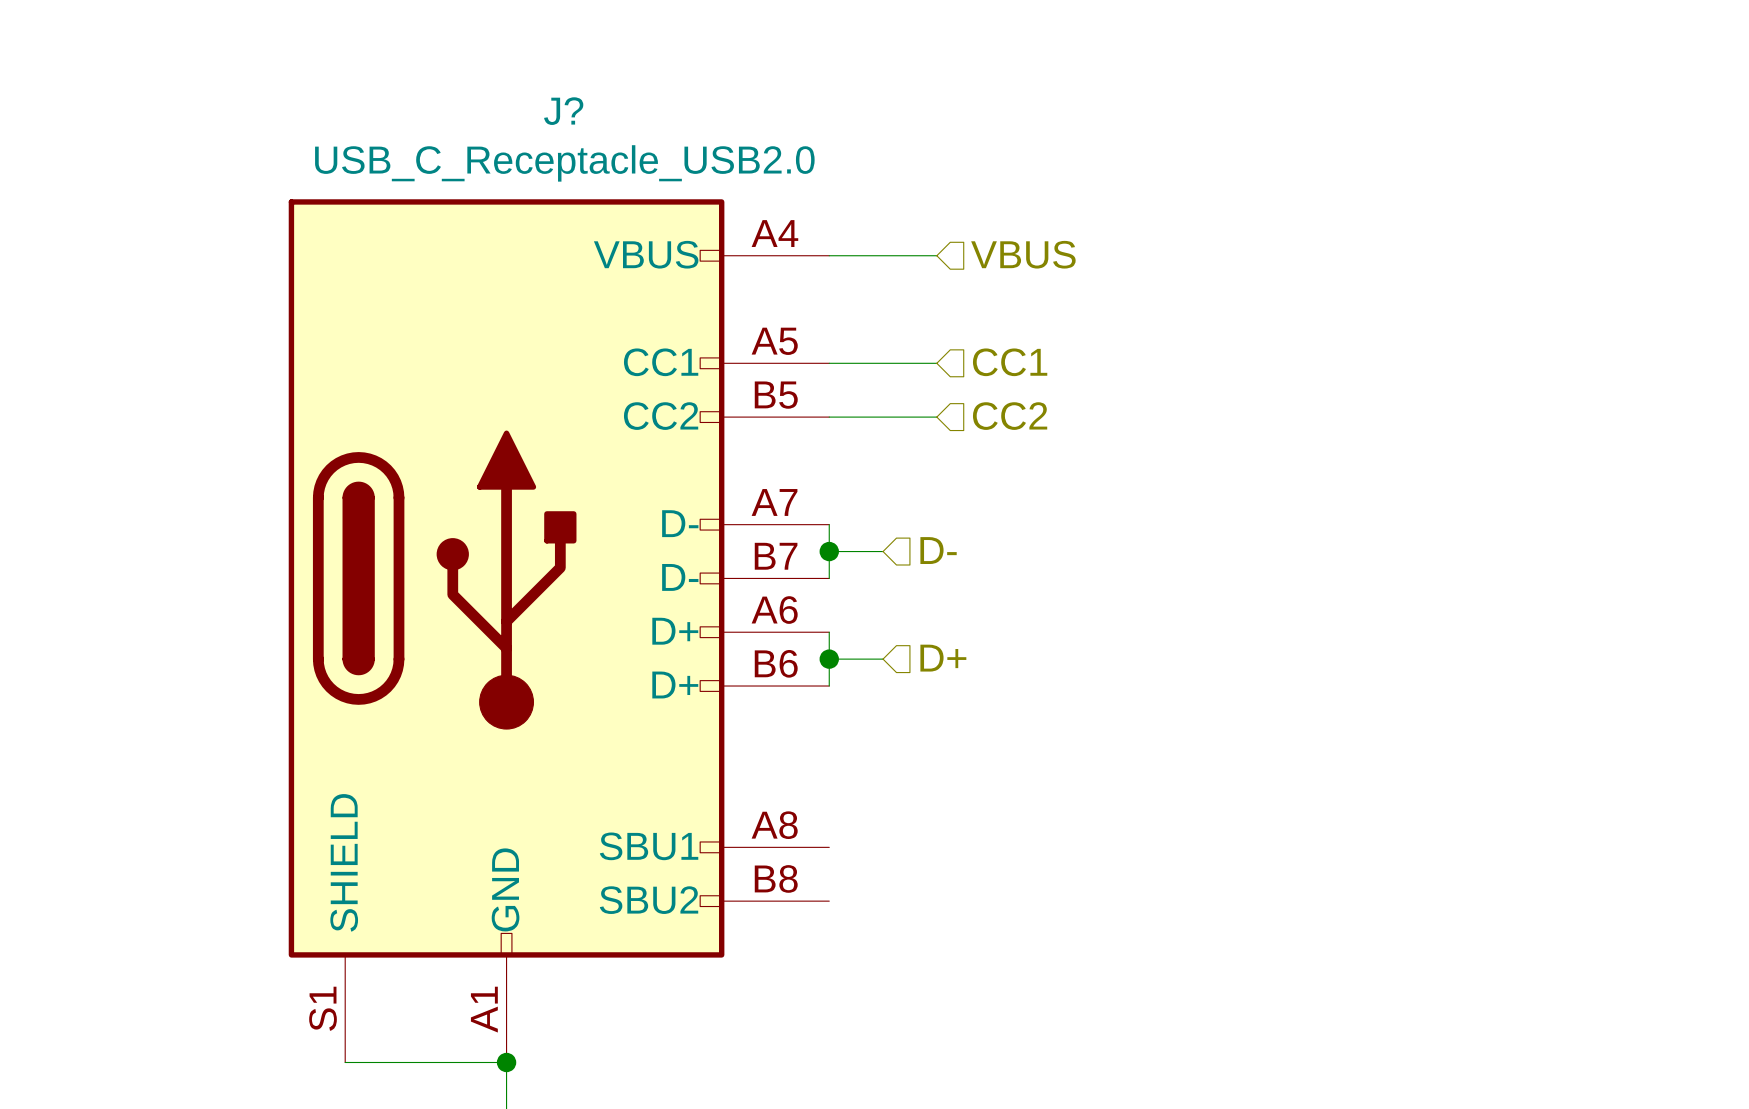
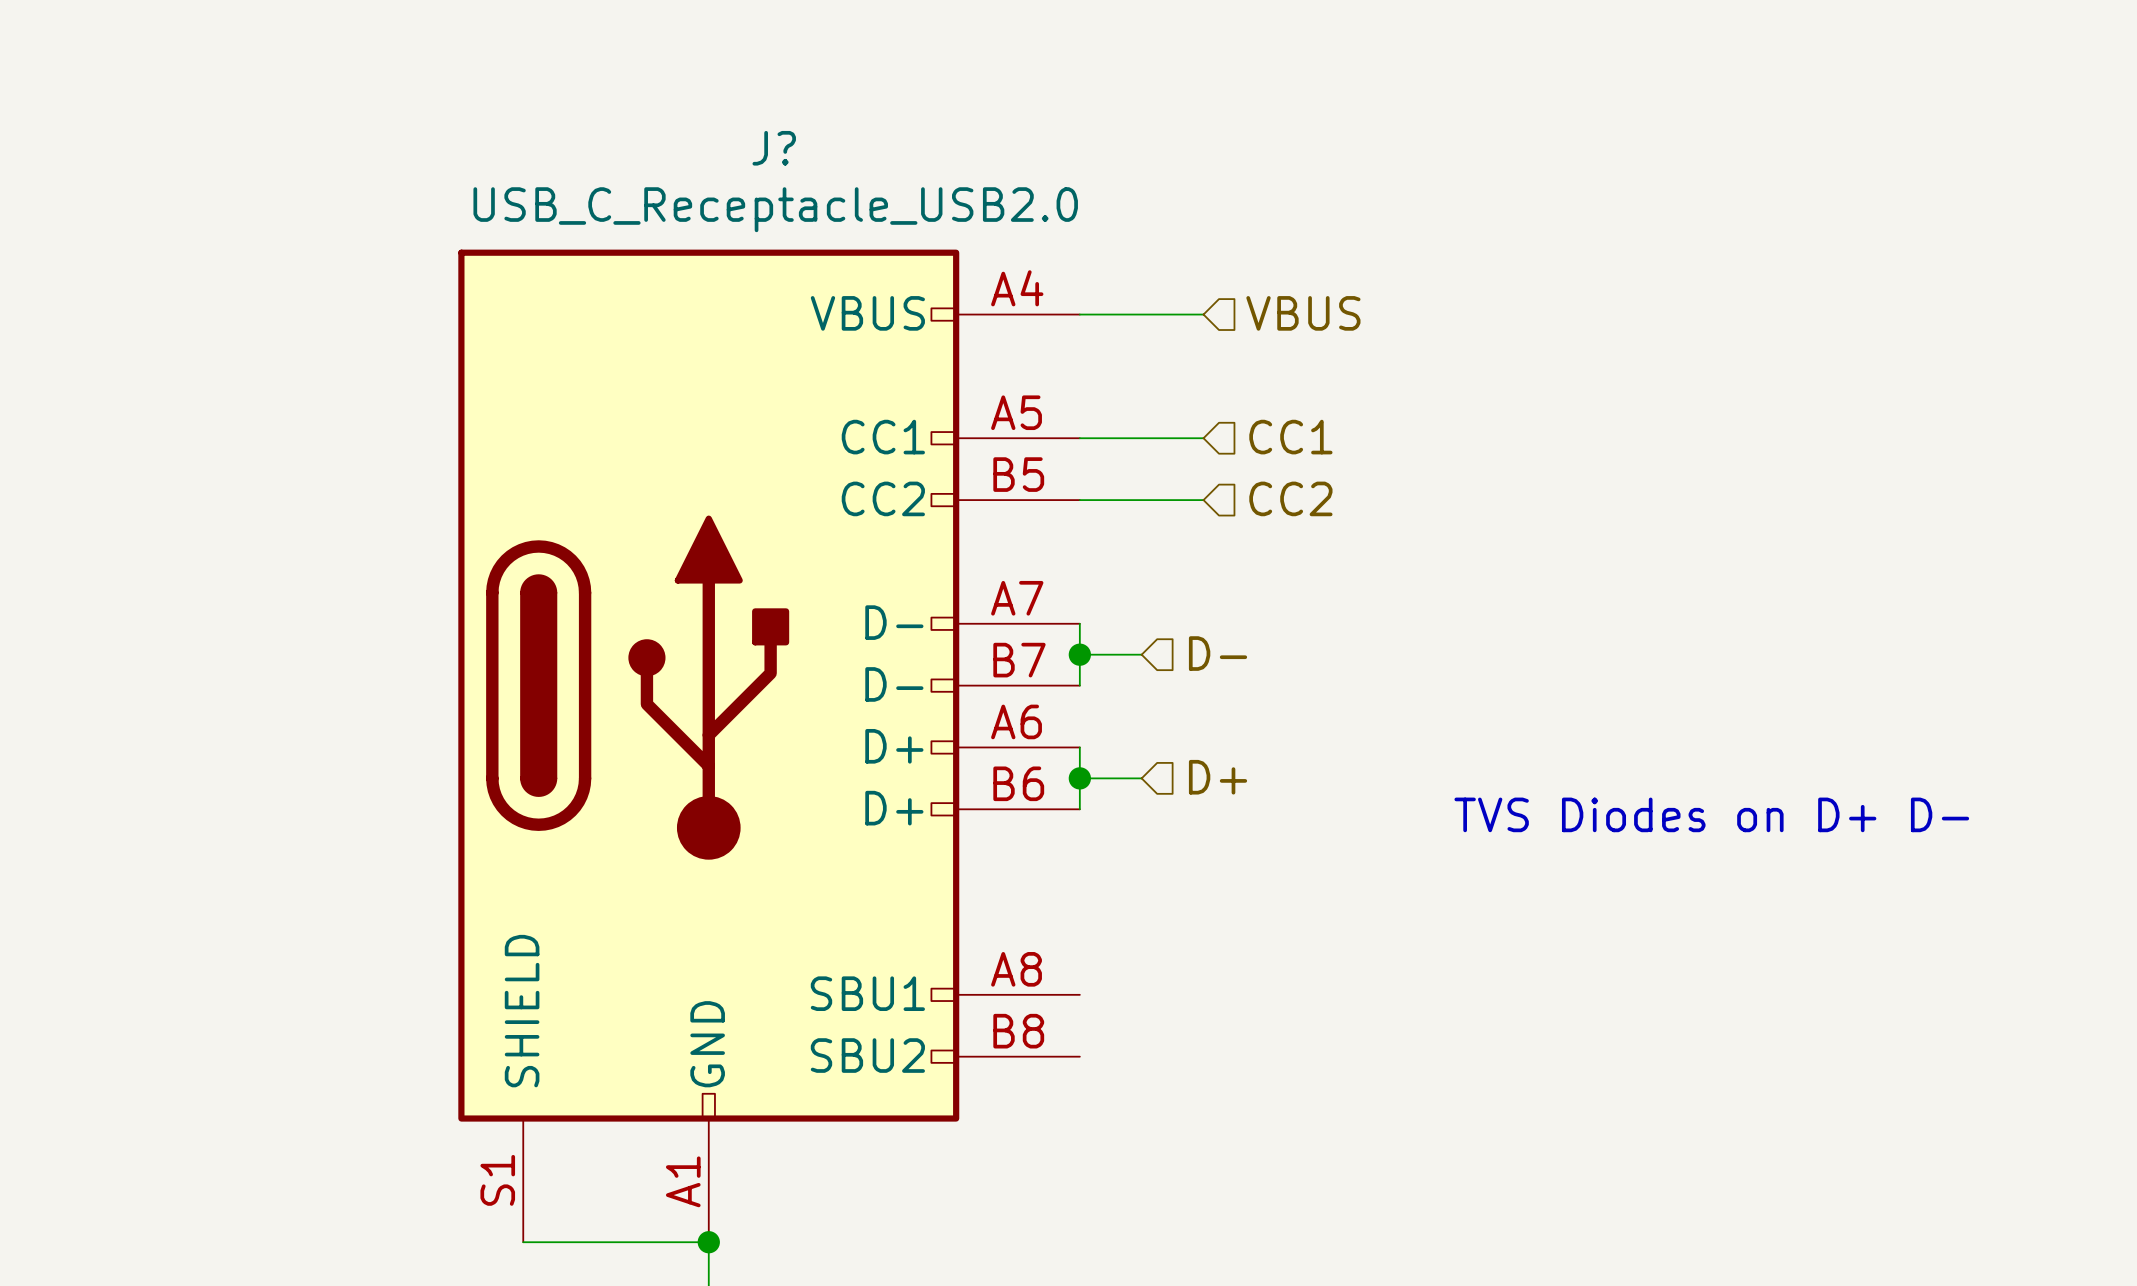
text: none -> TVS Diodes on D+ D- (1711, 814)

